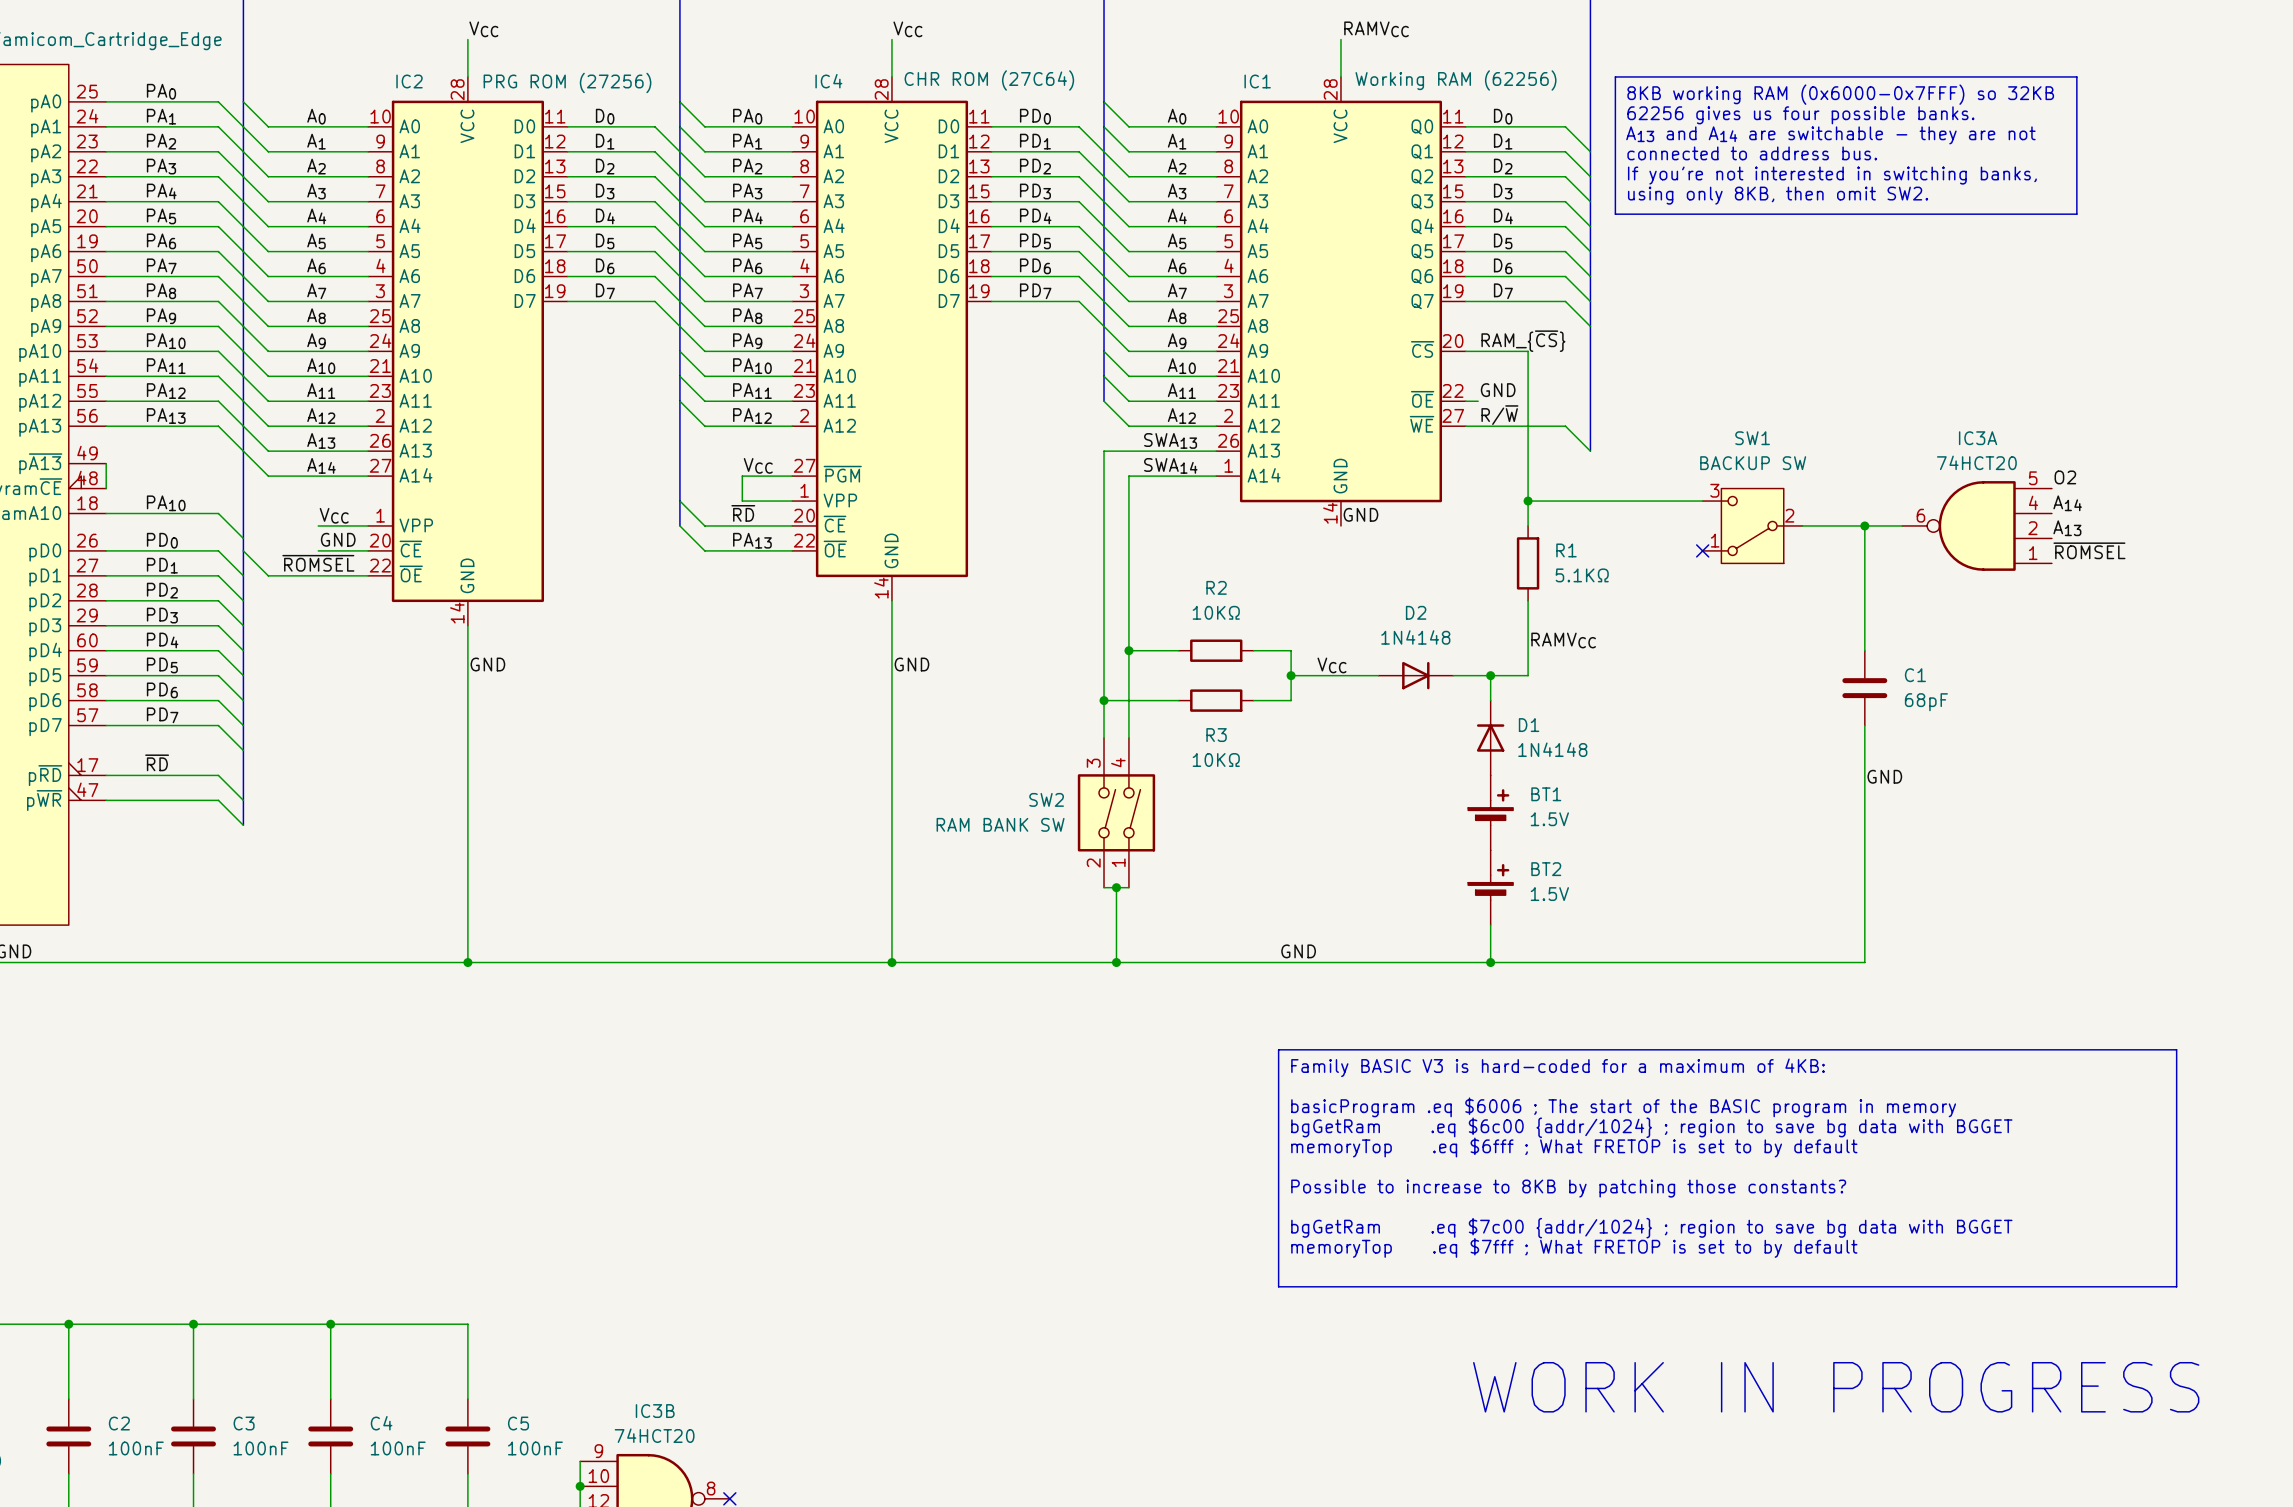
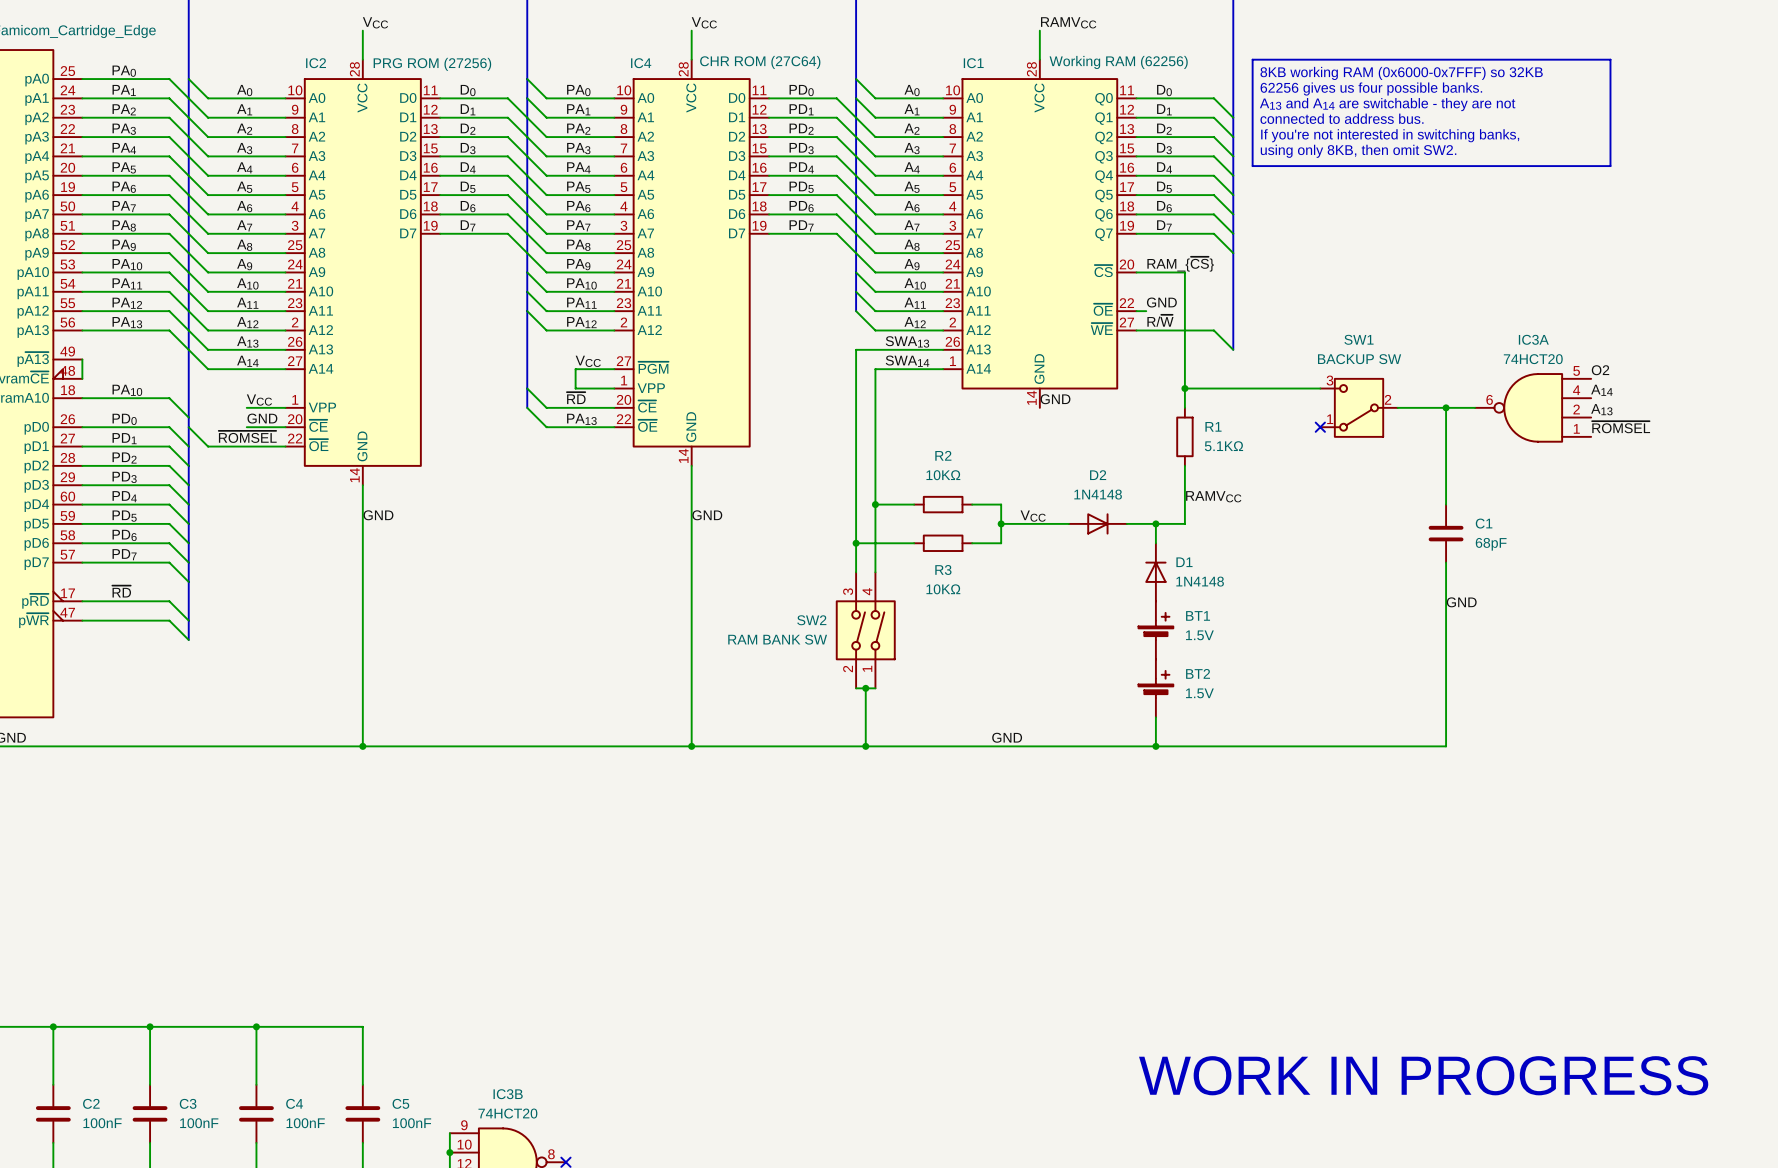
line: (1278, 1049) (2176, 1049) (2176, 1286) (1278, 1286) (1278, 1049) -> none
text: Family BASIC V3 is hard-coded for a maximum of 4KB: (1558, 1067) -> none
text: basicProgram .eq $6006 ; The start of the BASIC program in memory (1623, 1107) -> none
text: bgGetRam .eq $6c00 {addr/1024} ; region to save bg data with BGGET (1651, 1127) -> none
text: memoryTop .eq $6fff ; What FRETOP is set to by default (1574, 1147) -> none
text: Possible to increase to 8KB by patching those constants? (1568, 1188) -> none
text: bgGetRam .eq $7c00 {addr/1024} ; region to save bg data with BGGET (1651, 1228) -> none
text: memoryTop .eq $7fff ; What FRETOP is set to by default (1574, 1247) -> none

